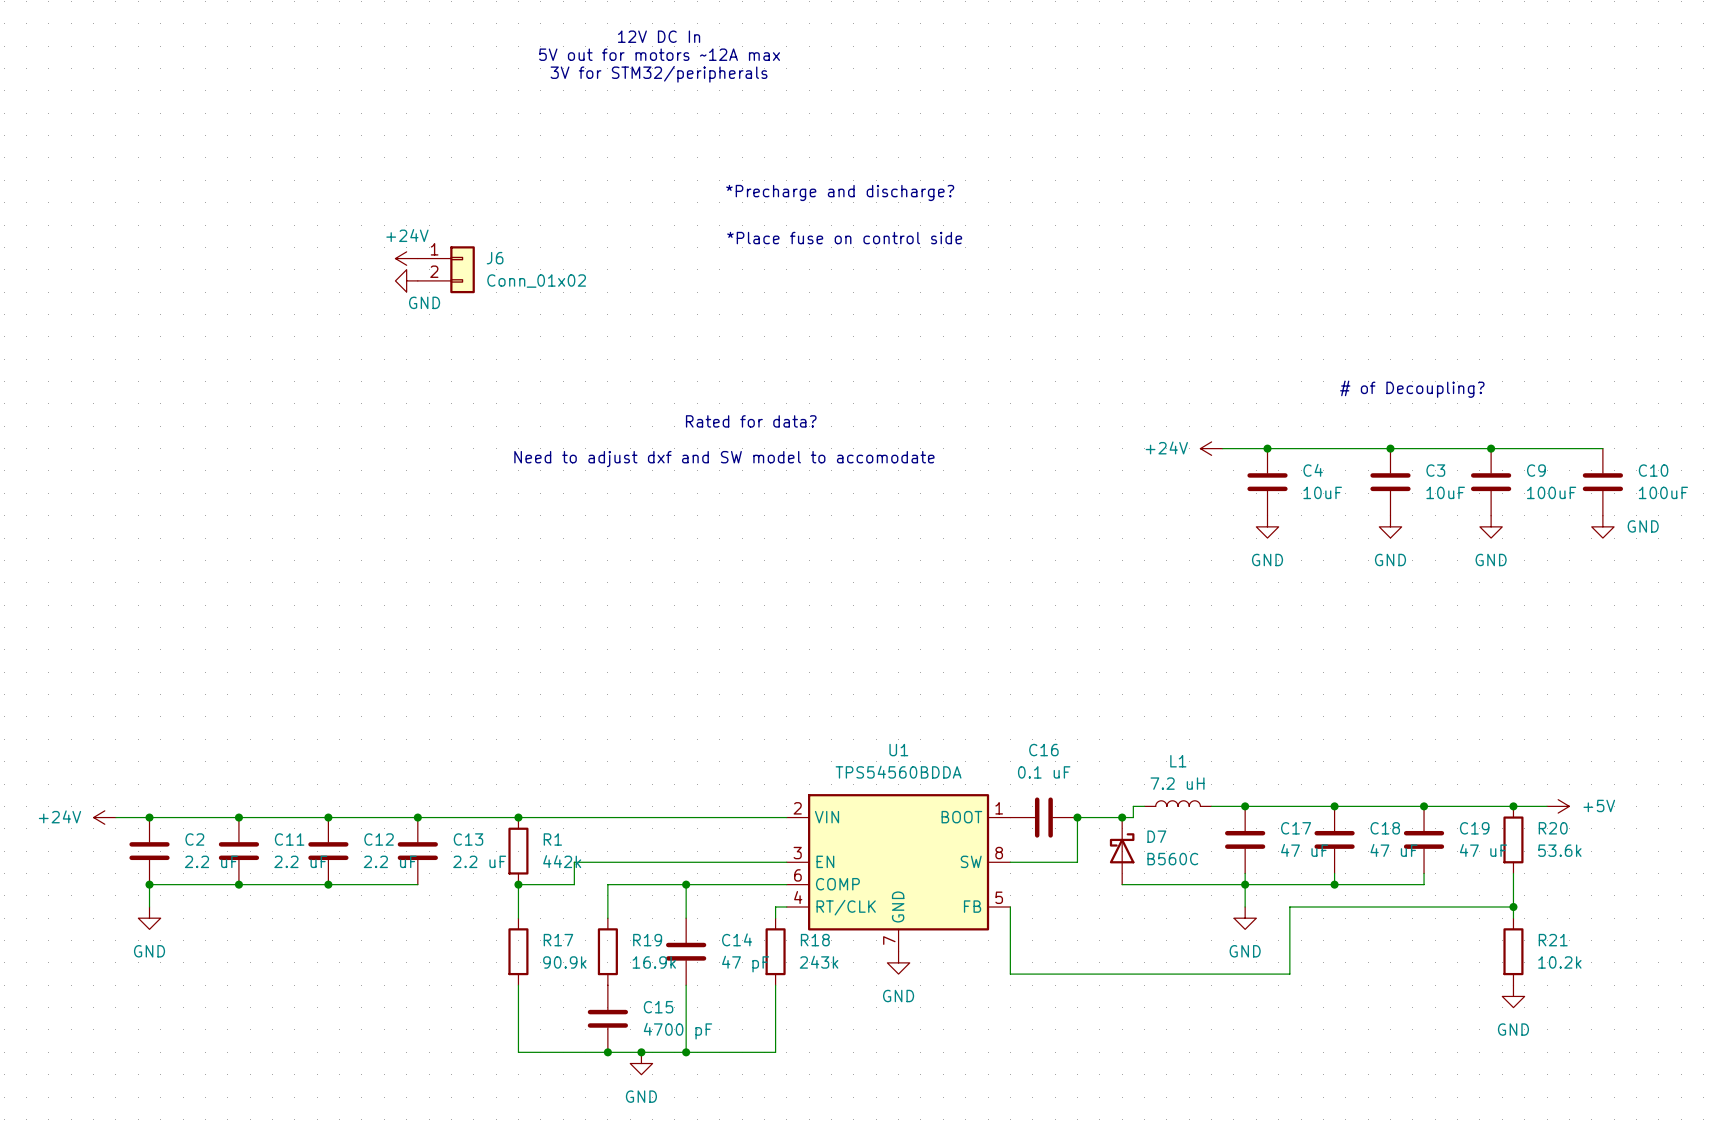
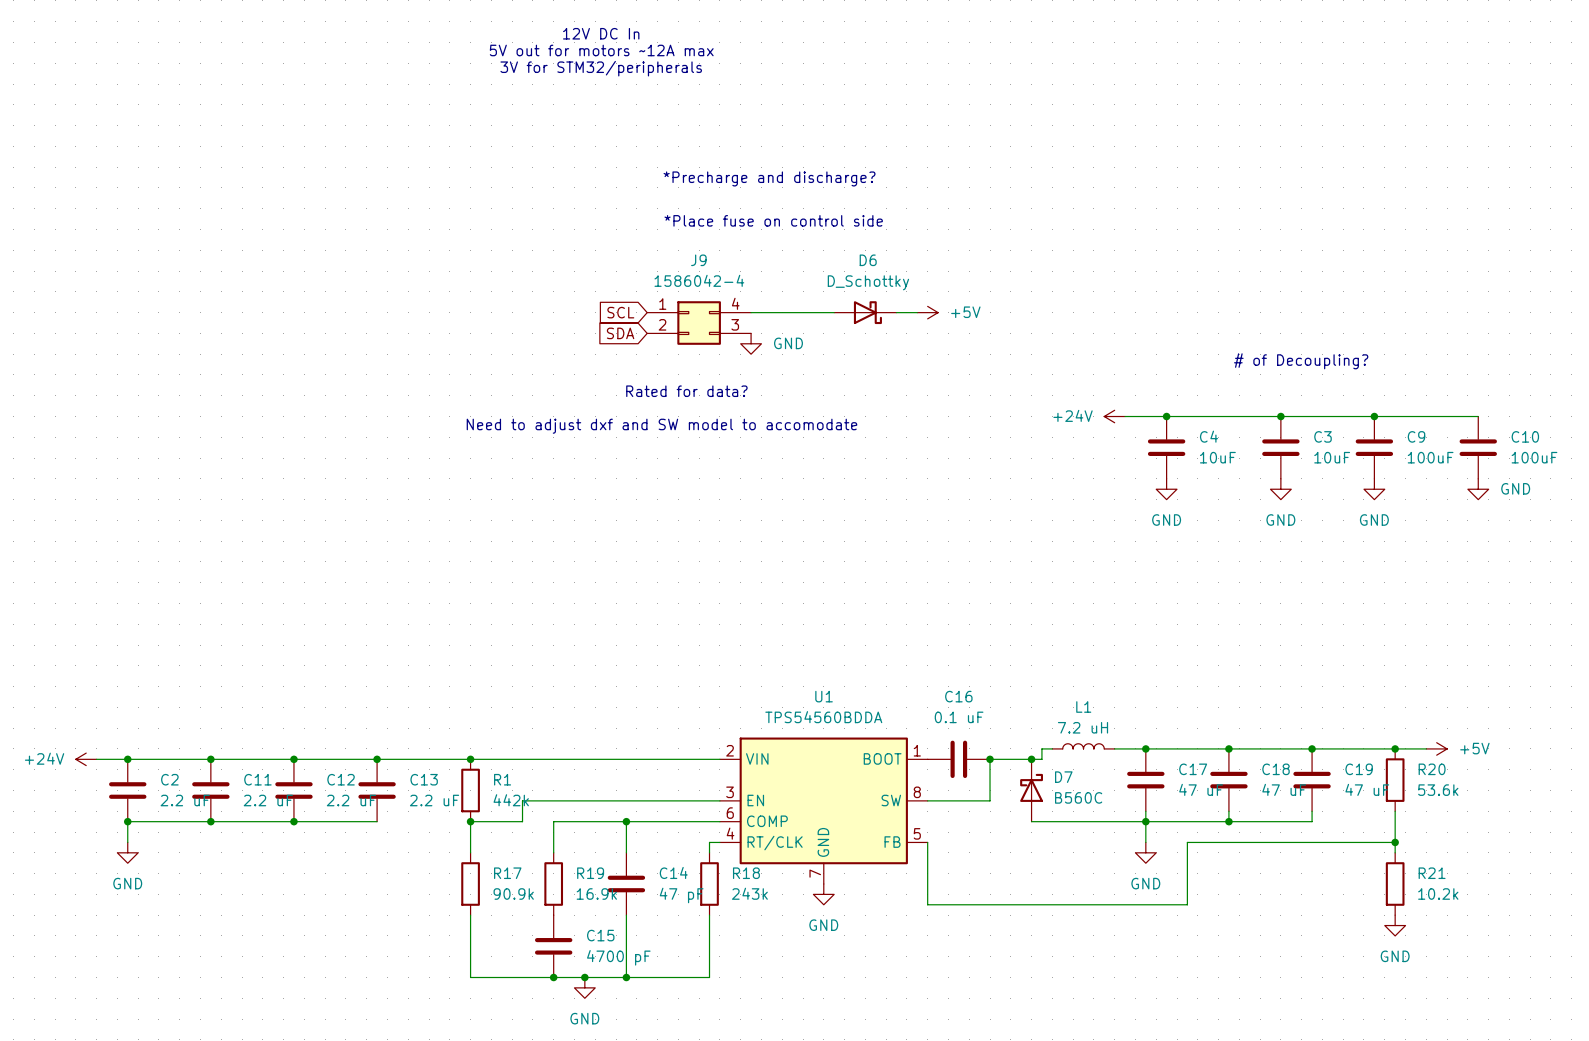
power symbol: +24V (406, 258) -> none
J6: Conn_01x02 (446, 269) -> none
power symbol: GND (406, 280) -> none
global label: none -> SCL (620, 312)
wire: none -> (751, 312) (834, 312)
D6: none -> D_Schottky (865, 312)
wire: none -> (896, 312) (917, 312)
power symbol: none -> +5V (927, 312)
J9: none -> 1586042-4 (699, 323)
global label: none -> SDA (620, 333)
power symbol: none -> GND (751, 343)

